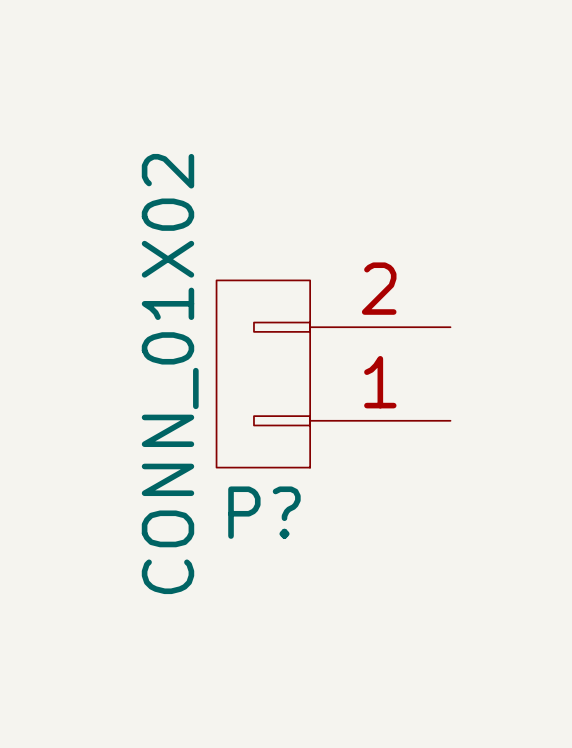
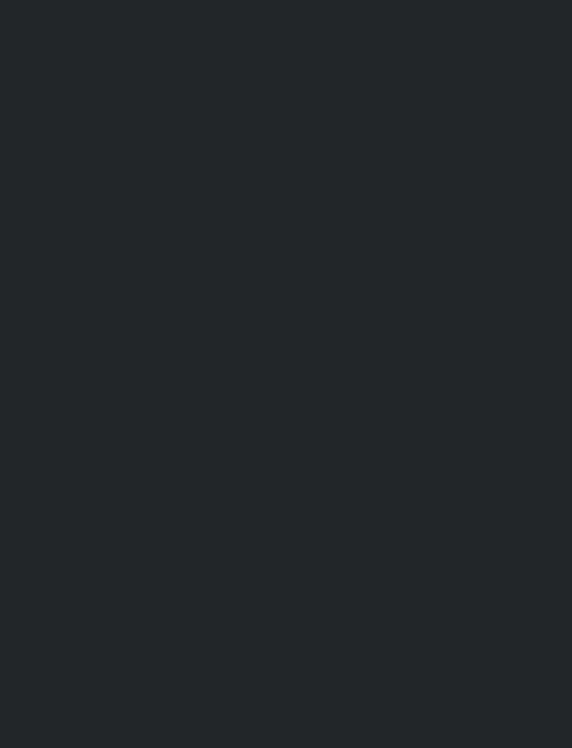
P?: CONN_01X02 (333, 374) -> none

